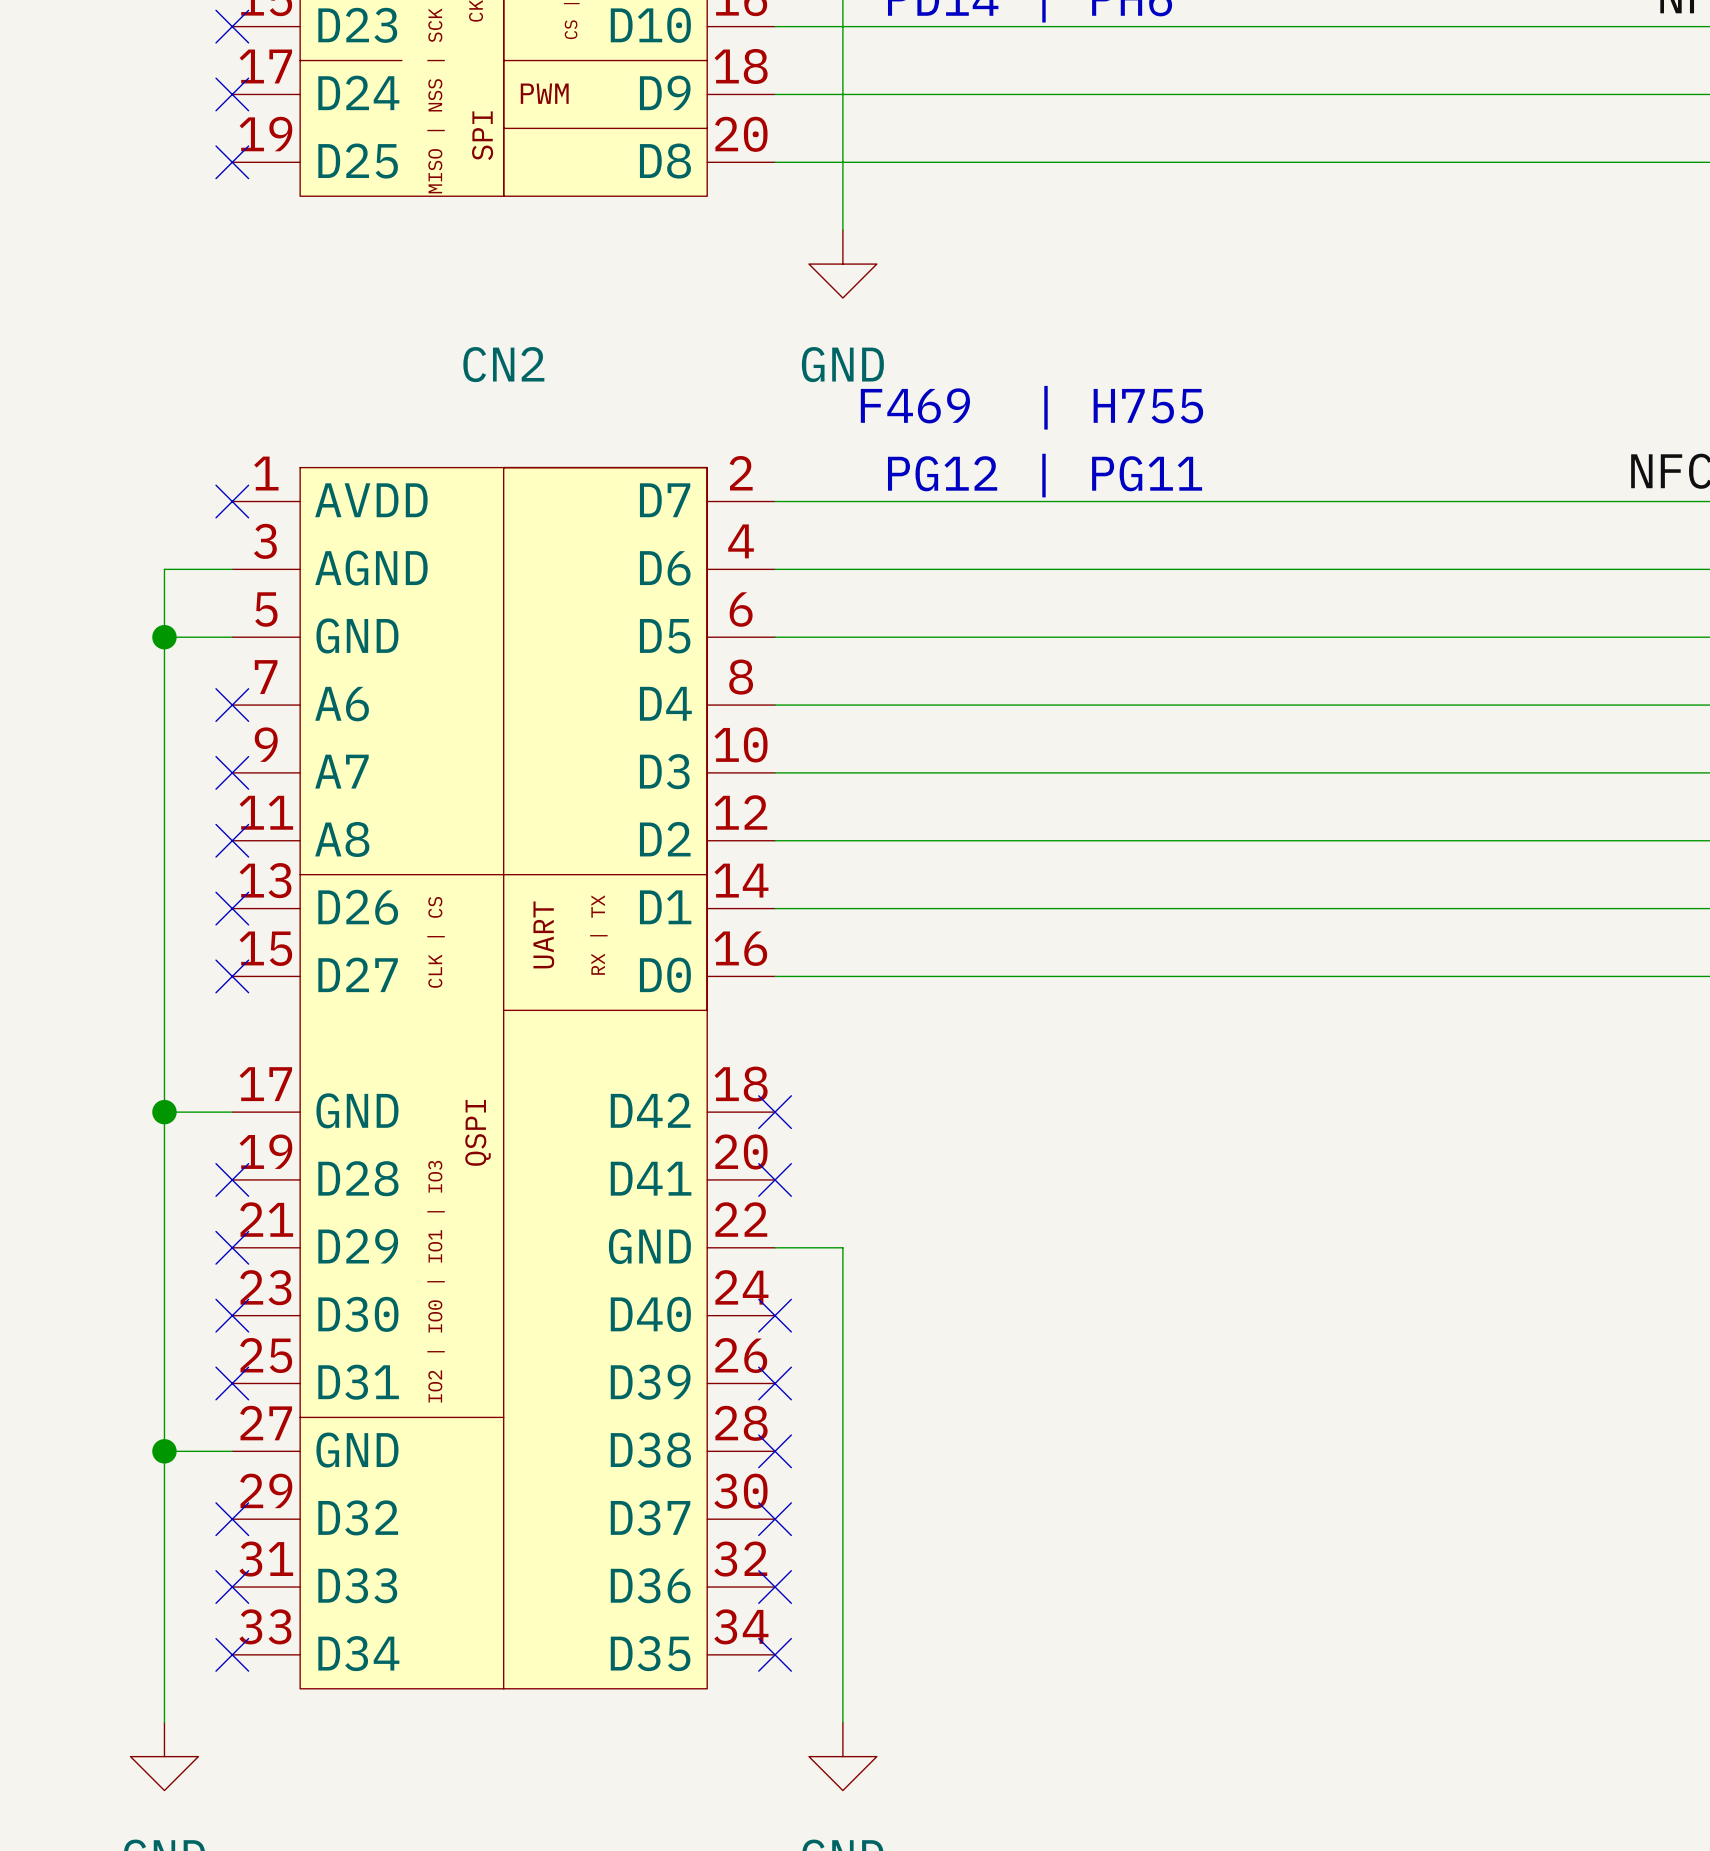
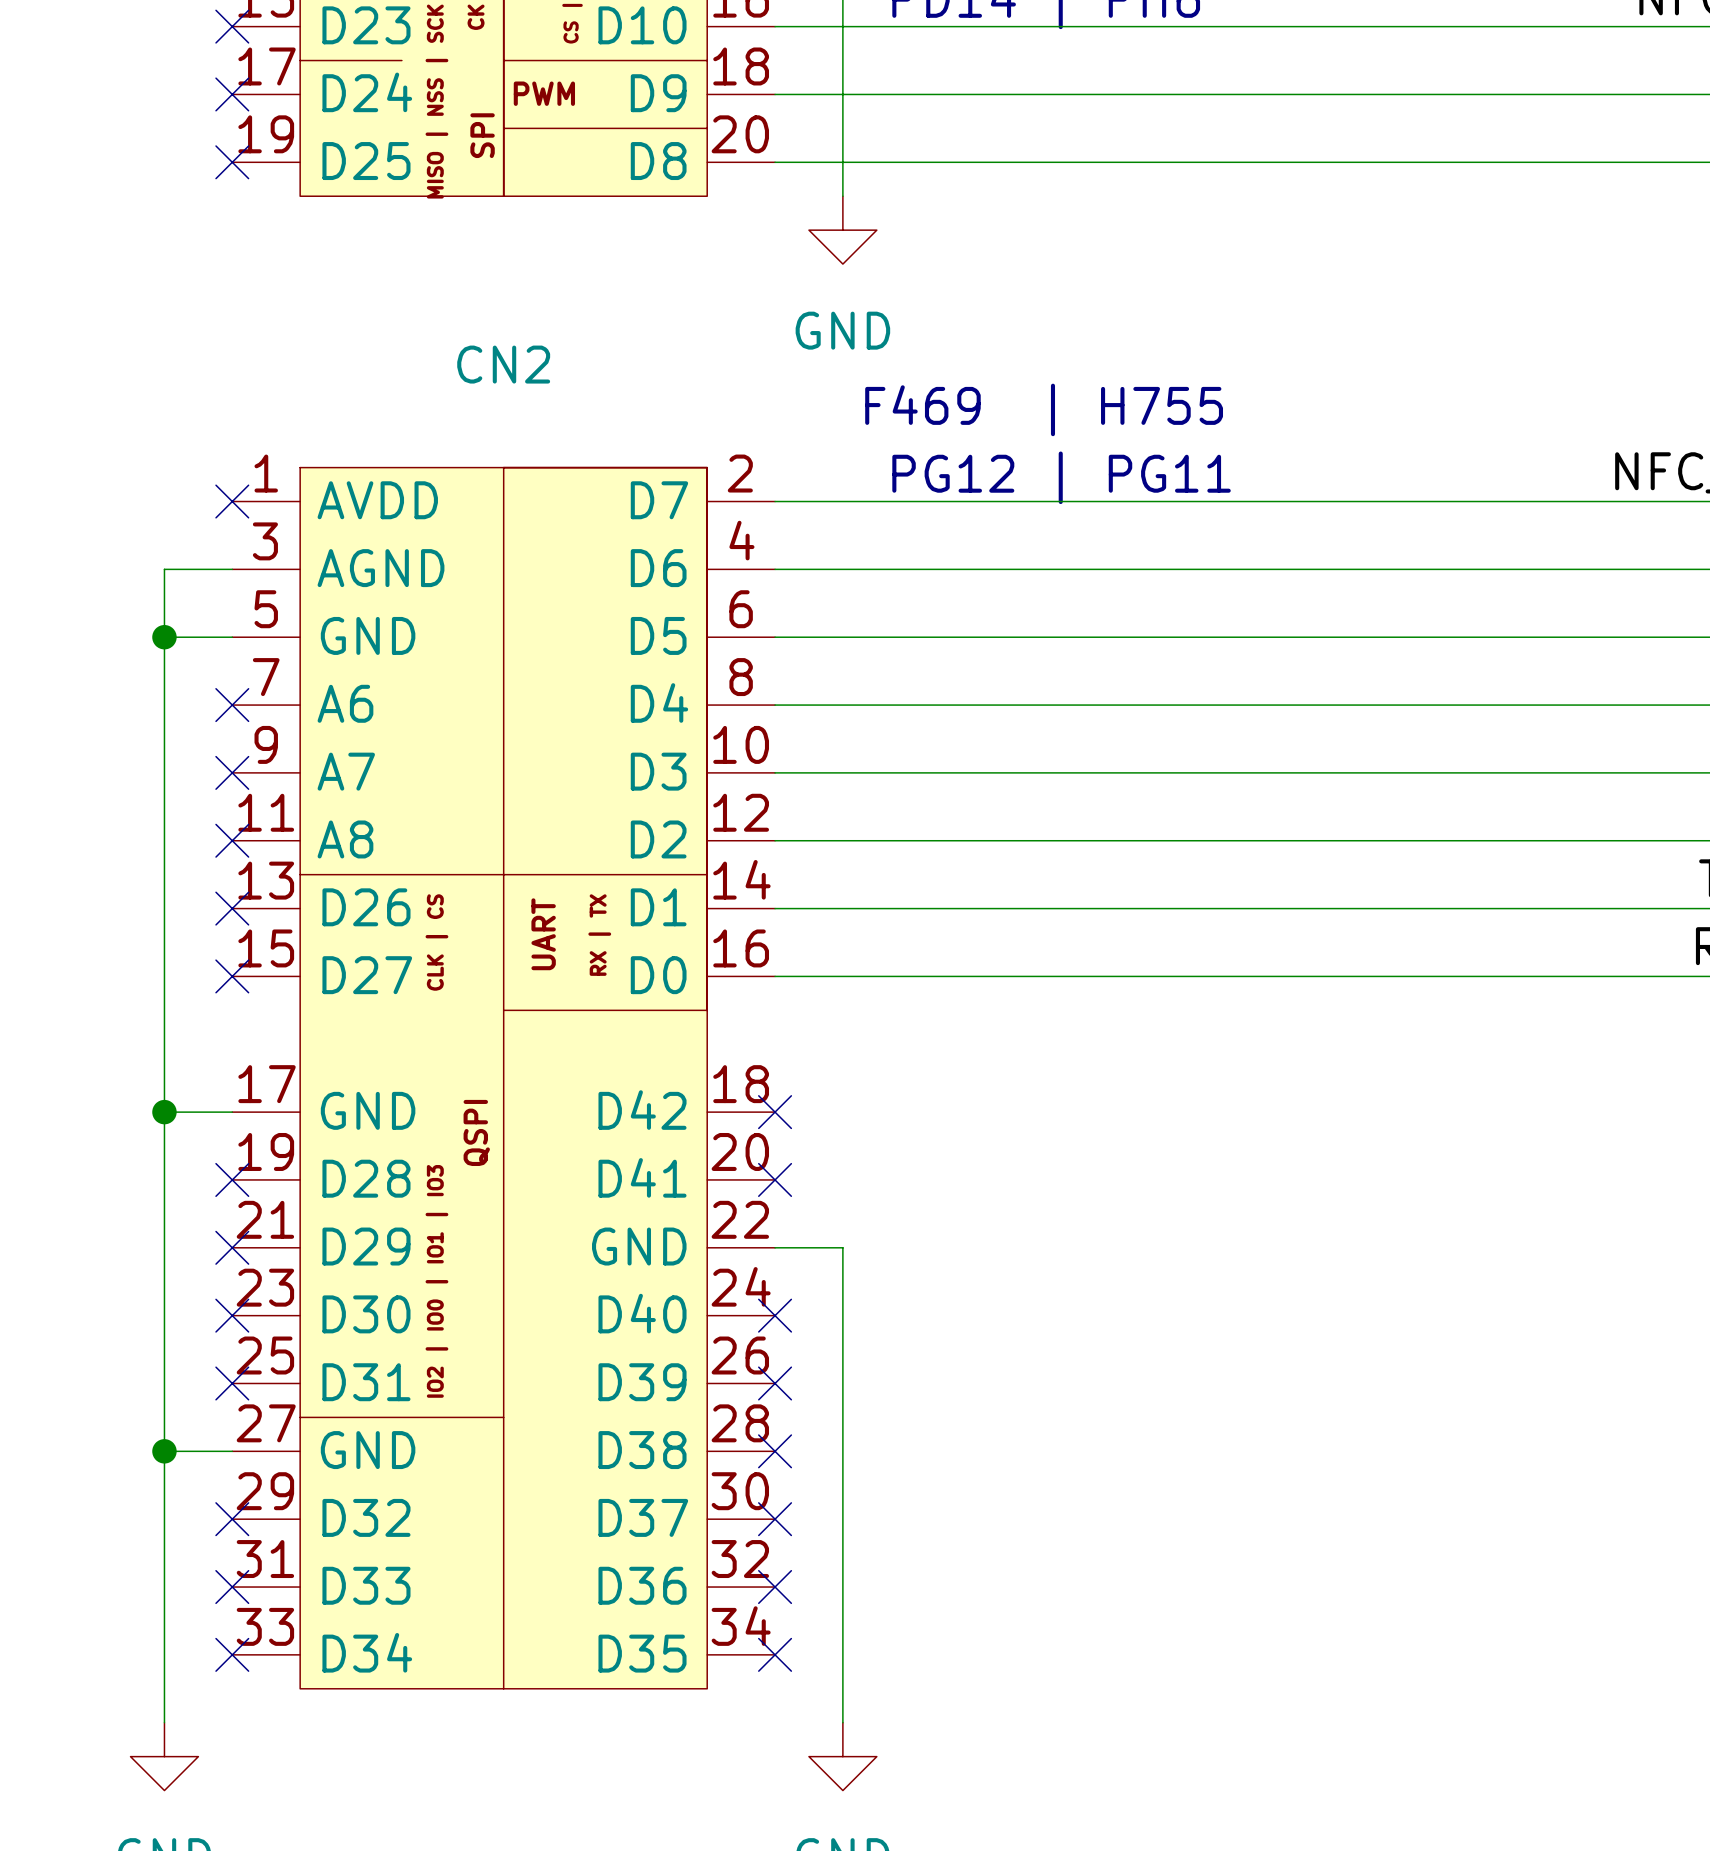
power symbol position: GND (842, 264) -> GND (842, 230)

